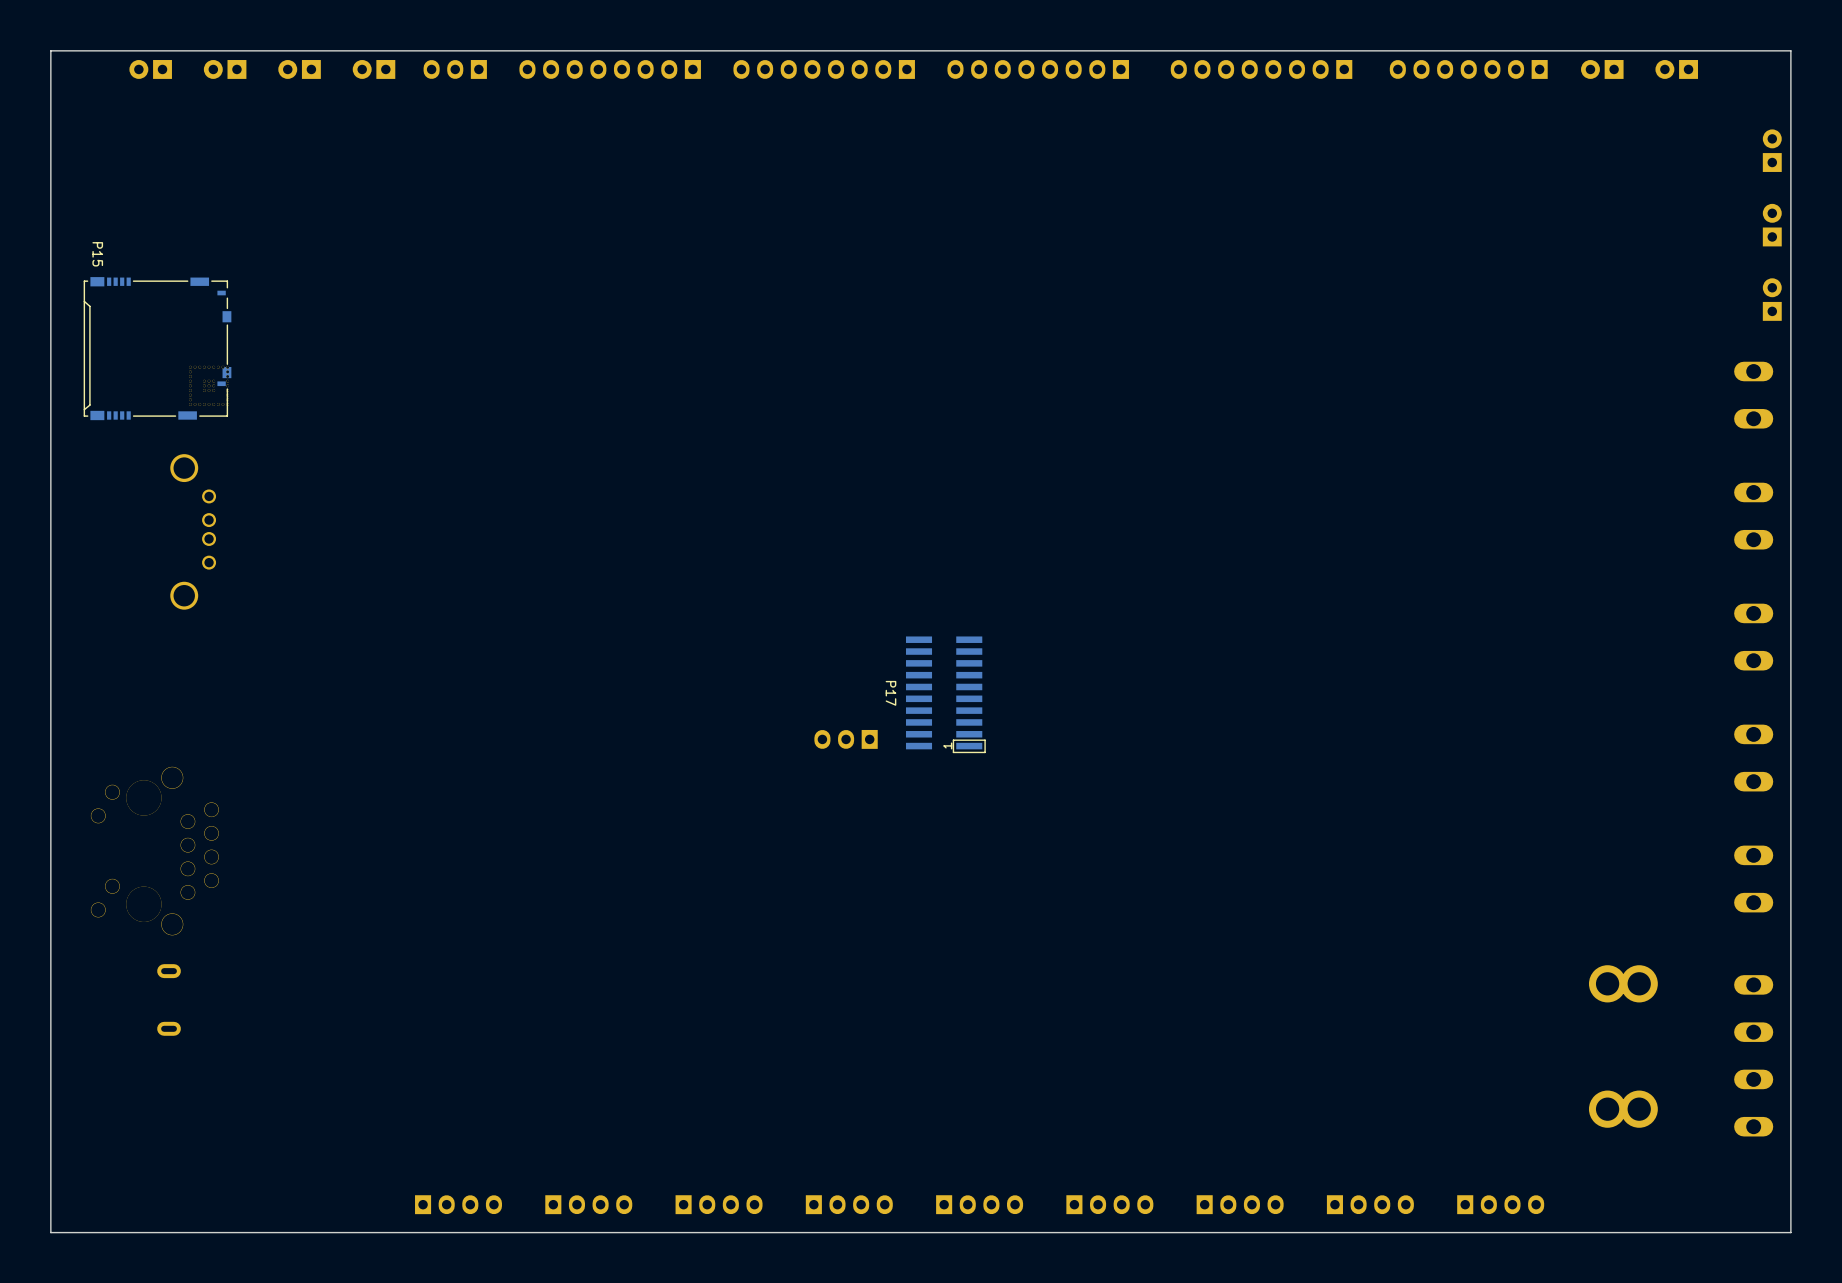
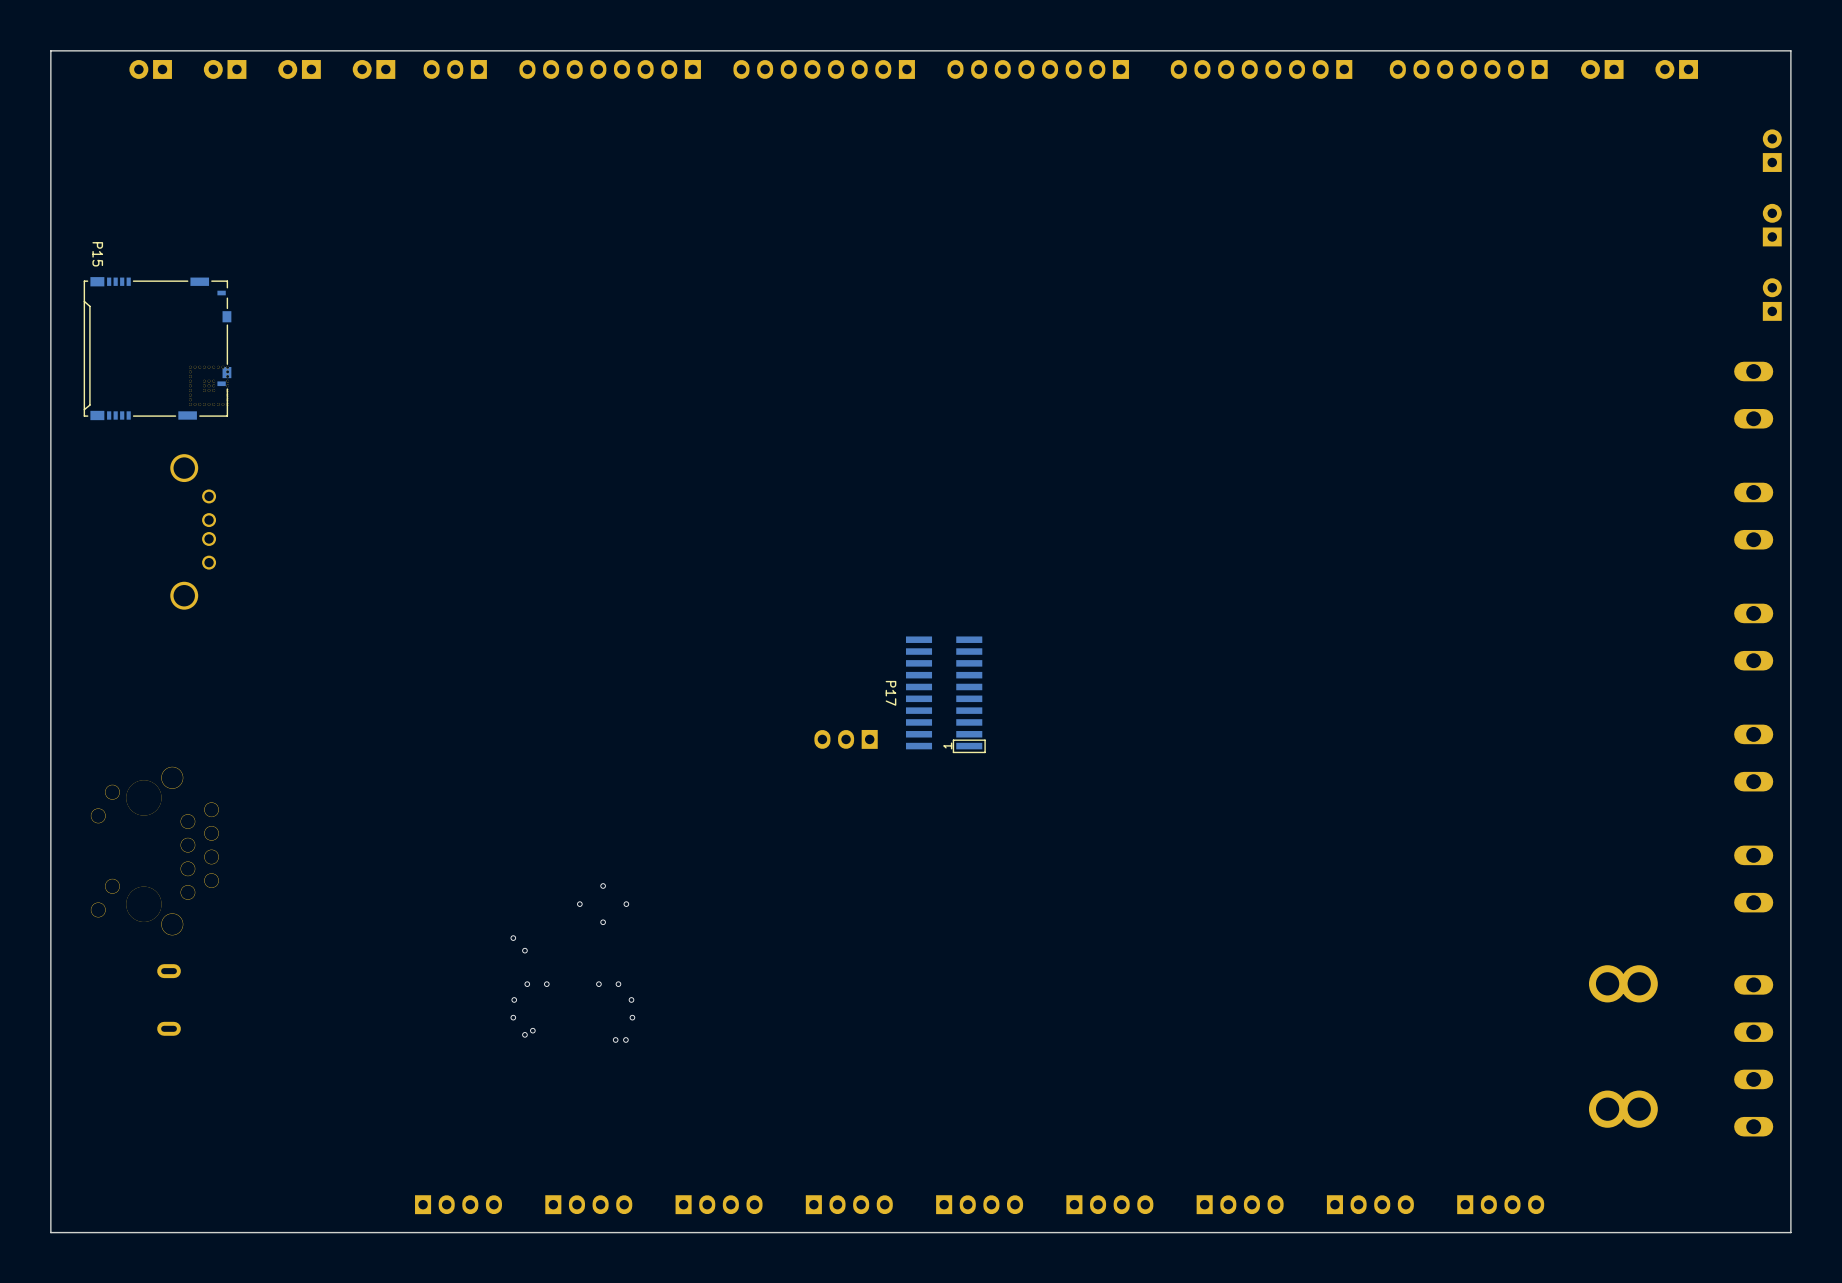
via: none -> (603, 885)
via: none -> (579, 904)
via: none -> (626, 904)
via: none -> (603, 922)
via: none -> (513, 938)
via: none -> (524, 950)
via: none -> (527, 984)
via: none -> (546, 984)
via: none -> (598, 984)
via: none -> (618, 984)
via: none -> (514, 999)
via: none -> (631, 999)
via: none -> (513, 1017)
via: none -> (632, 1017)
via: none -> (532, 1030)
via: none -> (524, 1034)
via: none -> (615, 1039)
via: none -> (625, 1039)

